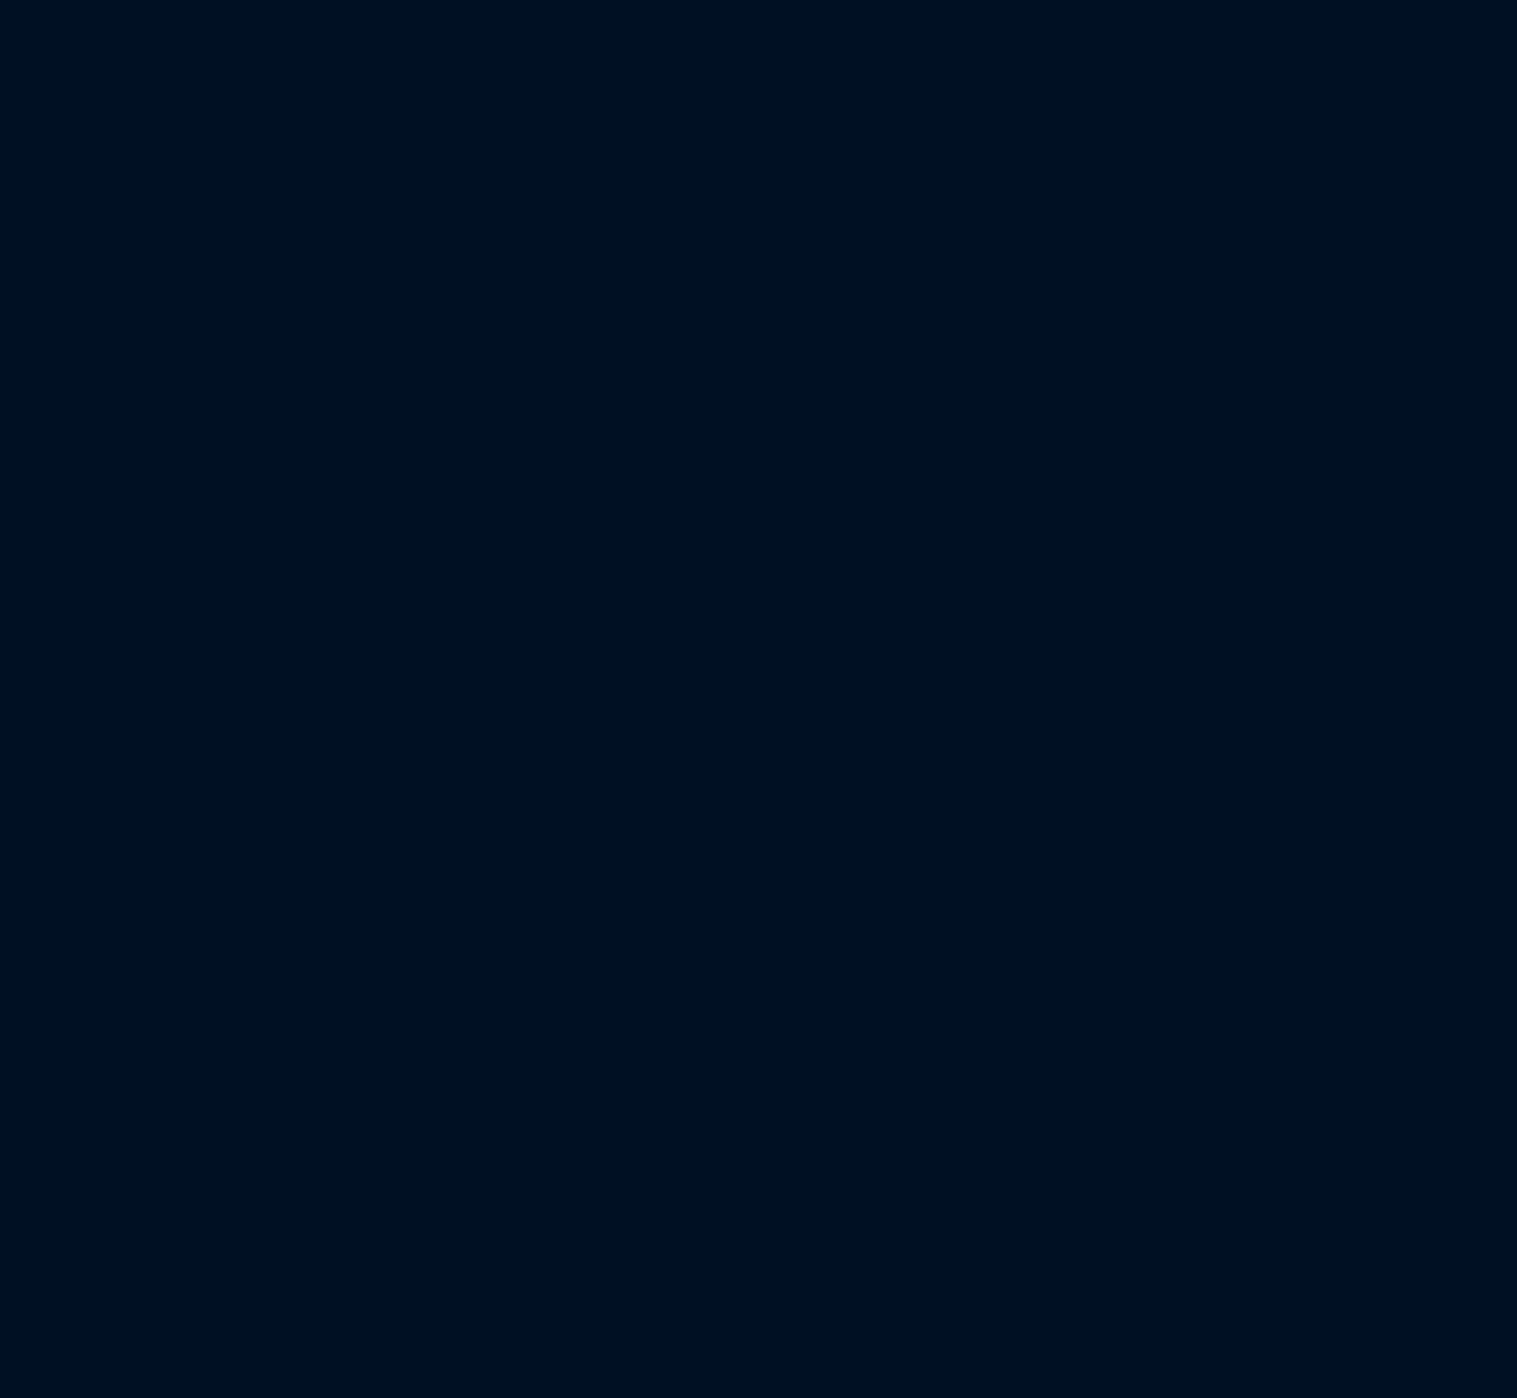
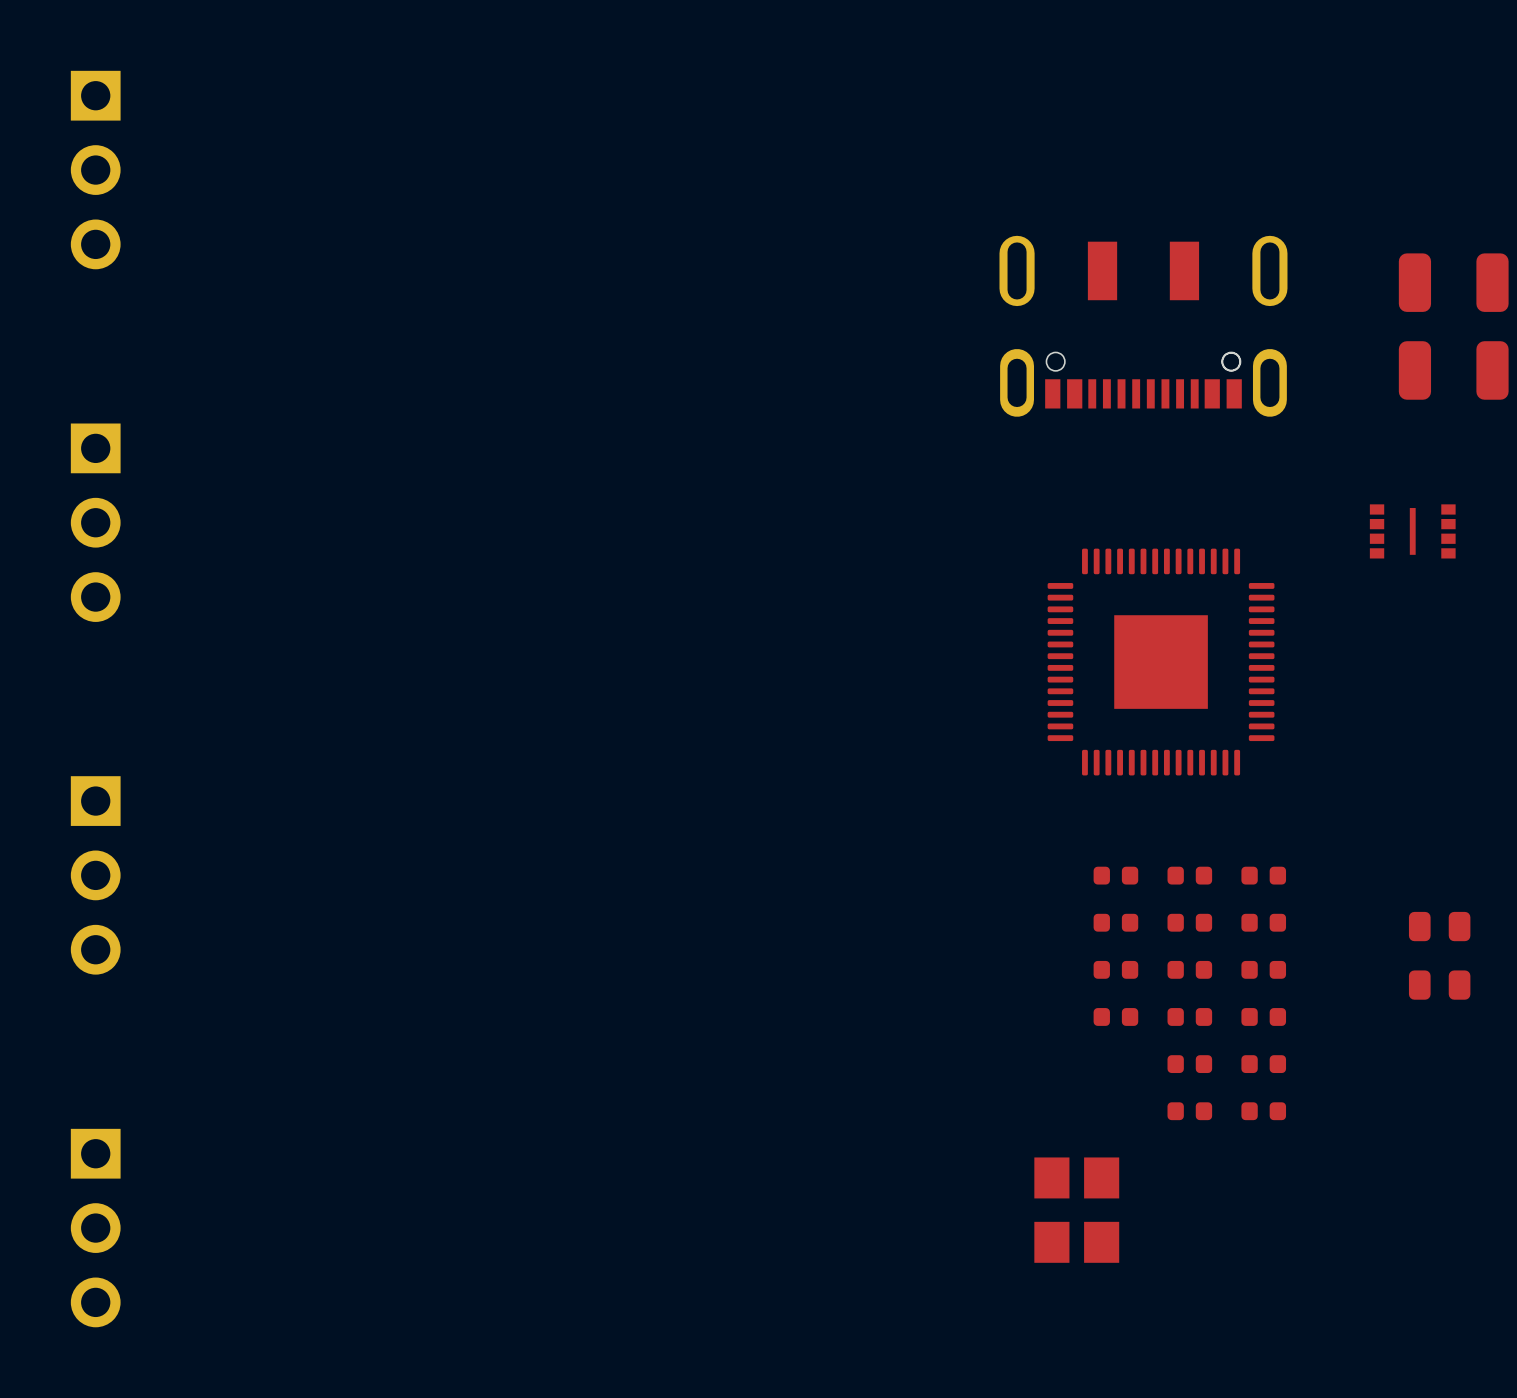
part: none -> (95, 170)
part: none -> (1453, 282)
part: none -> (1143, 326)
part: none -> (1453, 370)
part: none -> (95, 522)
part: none -> (1412, 531)
part: none -> (1161, 662)
part: none -> (95, 875)
part: none -> (1115, 875)
part: none -> (1189, 875)
part: none -> (1263, 875)
part: none -> (1115, 922)
part: none -> (1189, 922)
part: none -> (1263, 922)
part: none -> (1439, 926)
part: none -> (1115, 969)
part: none -> (1189, 969)
part: none -> (1263, 969)
part: none -> (1439, 985)
part: none -> (1115, 1016)
part: none -> (1189, 1016)
part: none -> (1263, 1016)
part: none -> (1189, 1064)
part: none -> (1263, 1064)
part: none -> (1189, 1111)
part: none -> (1263, 1111)
part: none -> (1076, 1210)
part: none -> (95, 1228)

